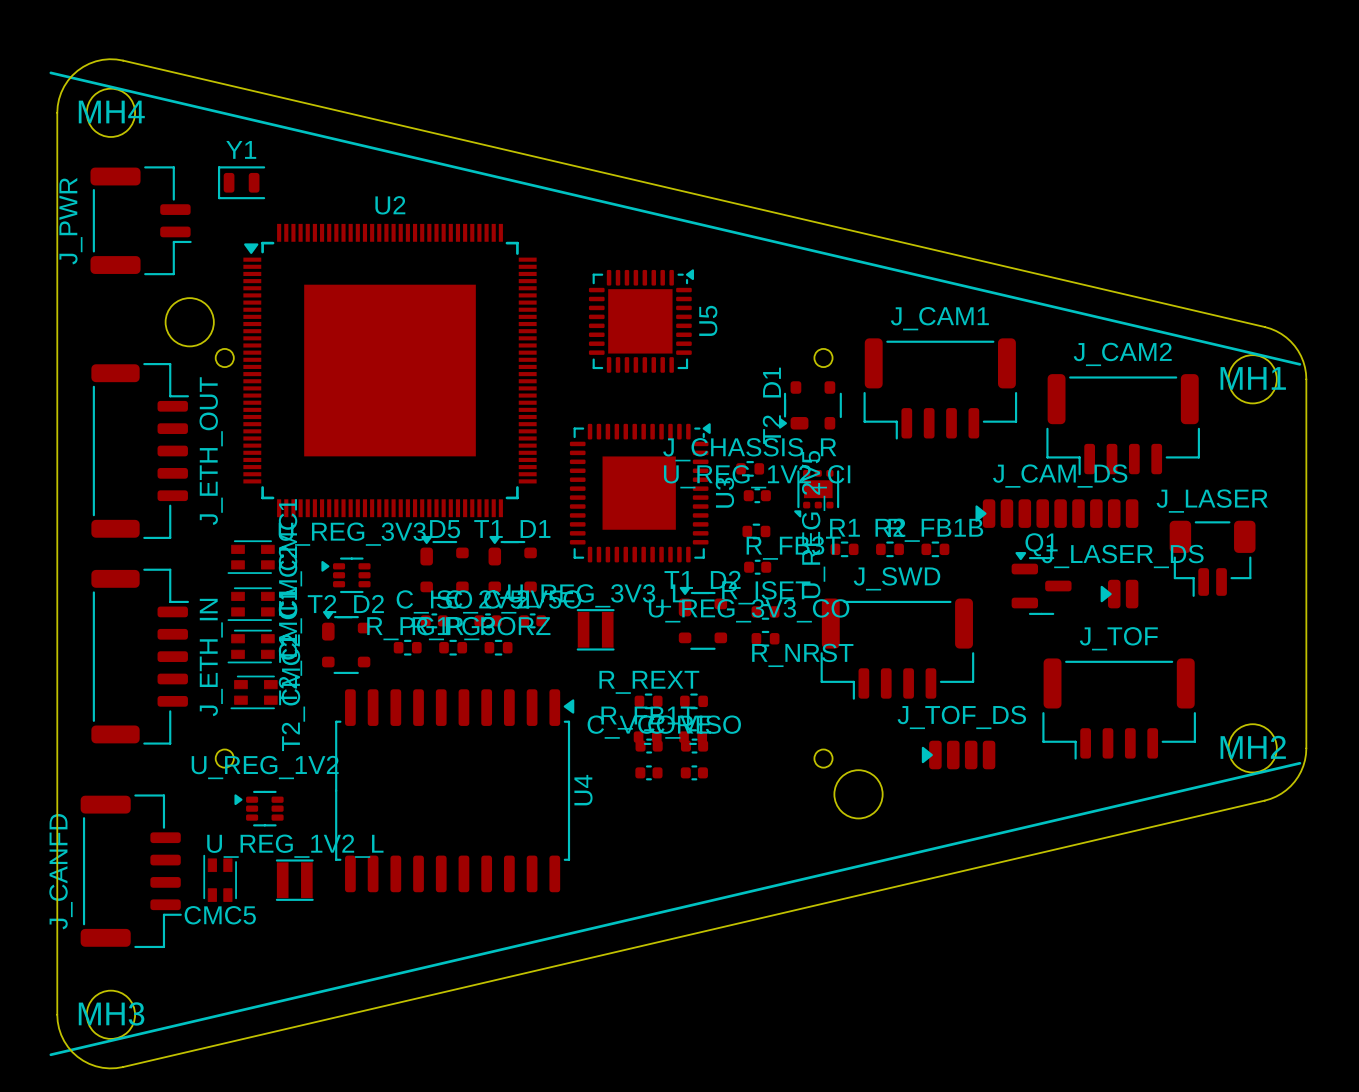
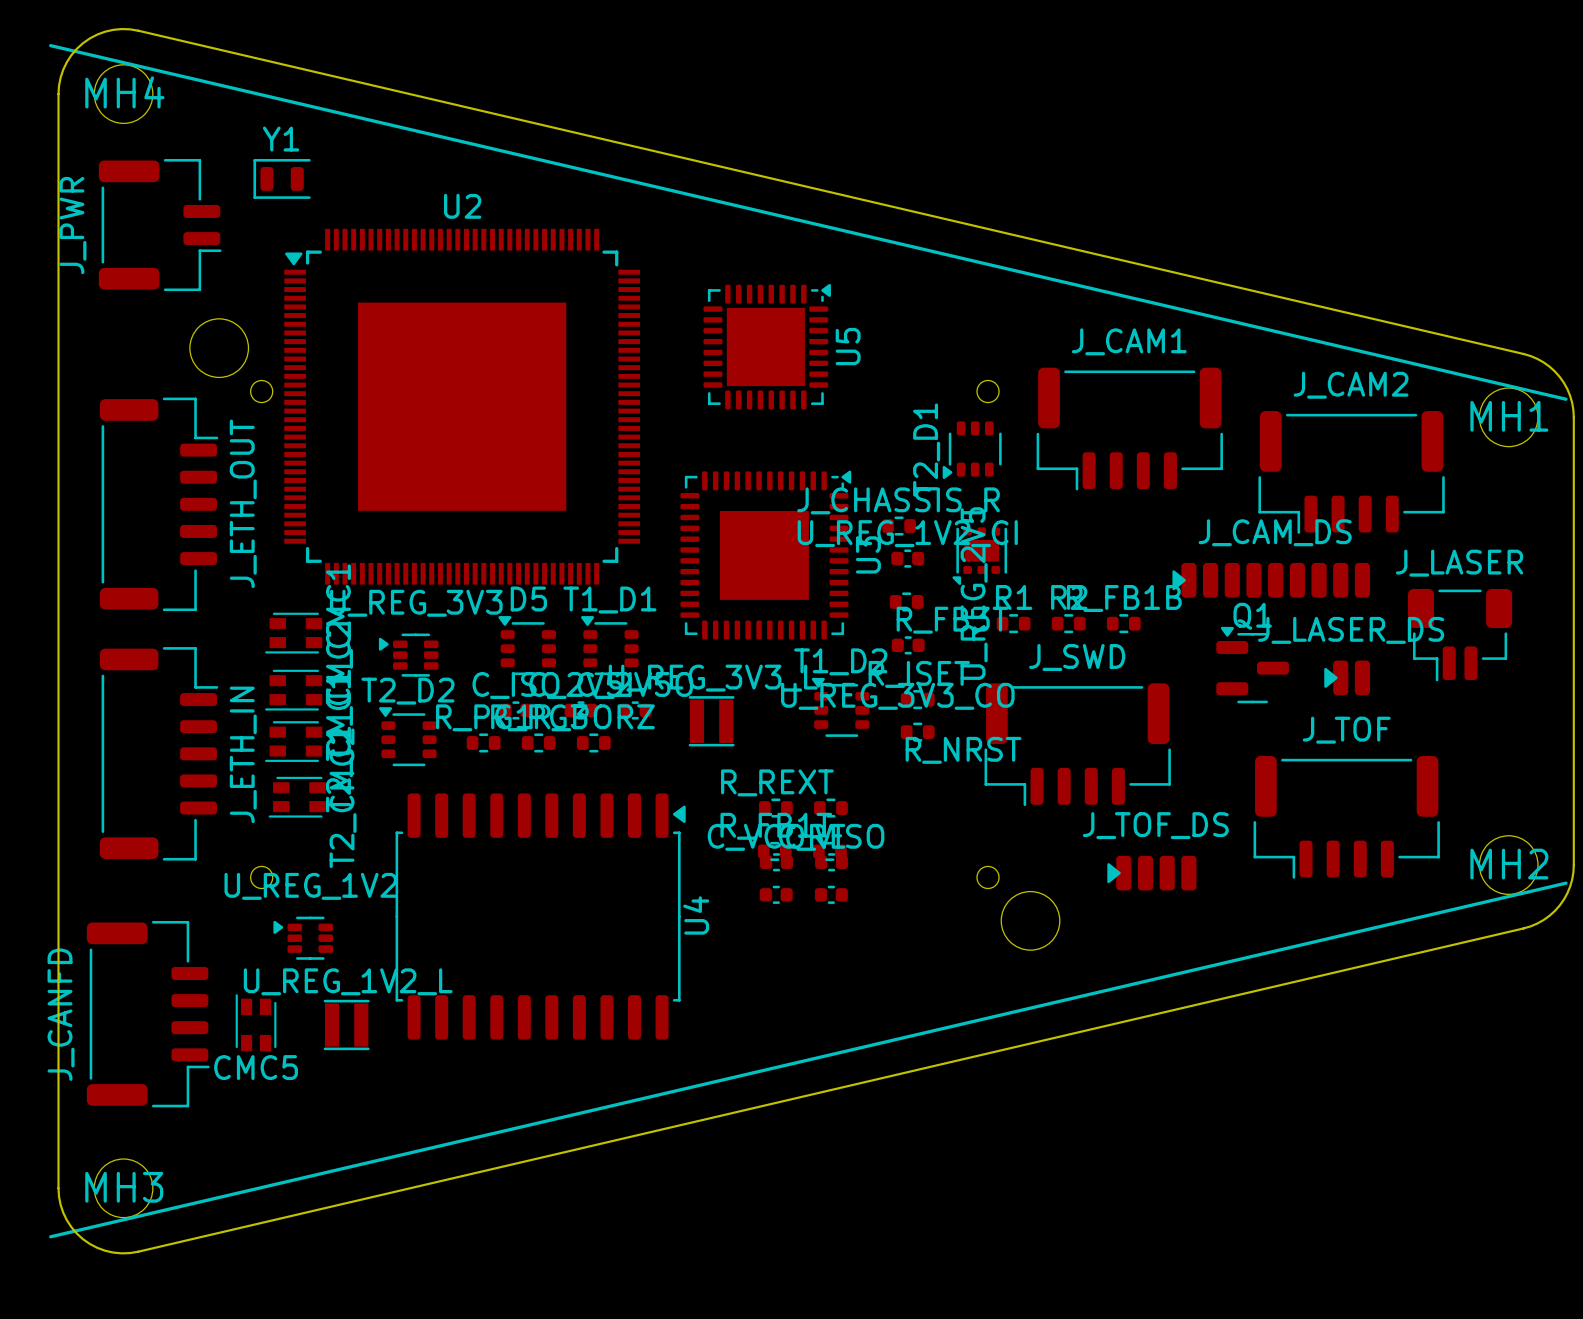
T2_D1 footprint: [778, 381, 842, 430] -> [942, 421, 1002, 479]
D5 footprint: [420, 535, 469, 599] -> [498, 616, 556, 676]
T1_D1 footprint: [488, 535, 537, 599] -> [581, 616, 639, 676]
T1_D2 footprint: [678, 586, 728, 650] -> [811, 677, 870, 737]
T2_D2 footprint: [322, 611, 371, 674] -> [379, 707, 437, 767]

